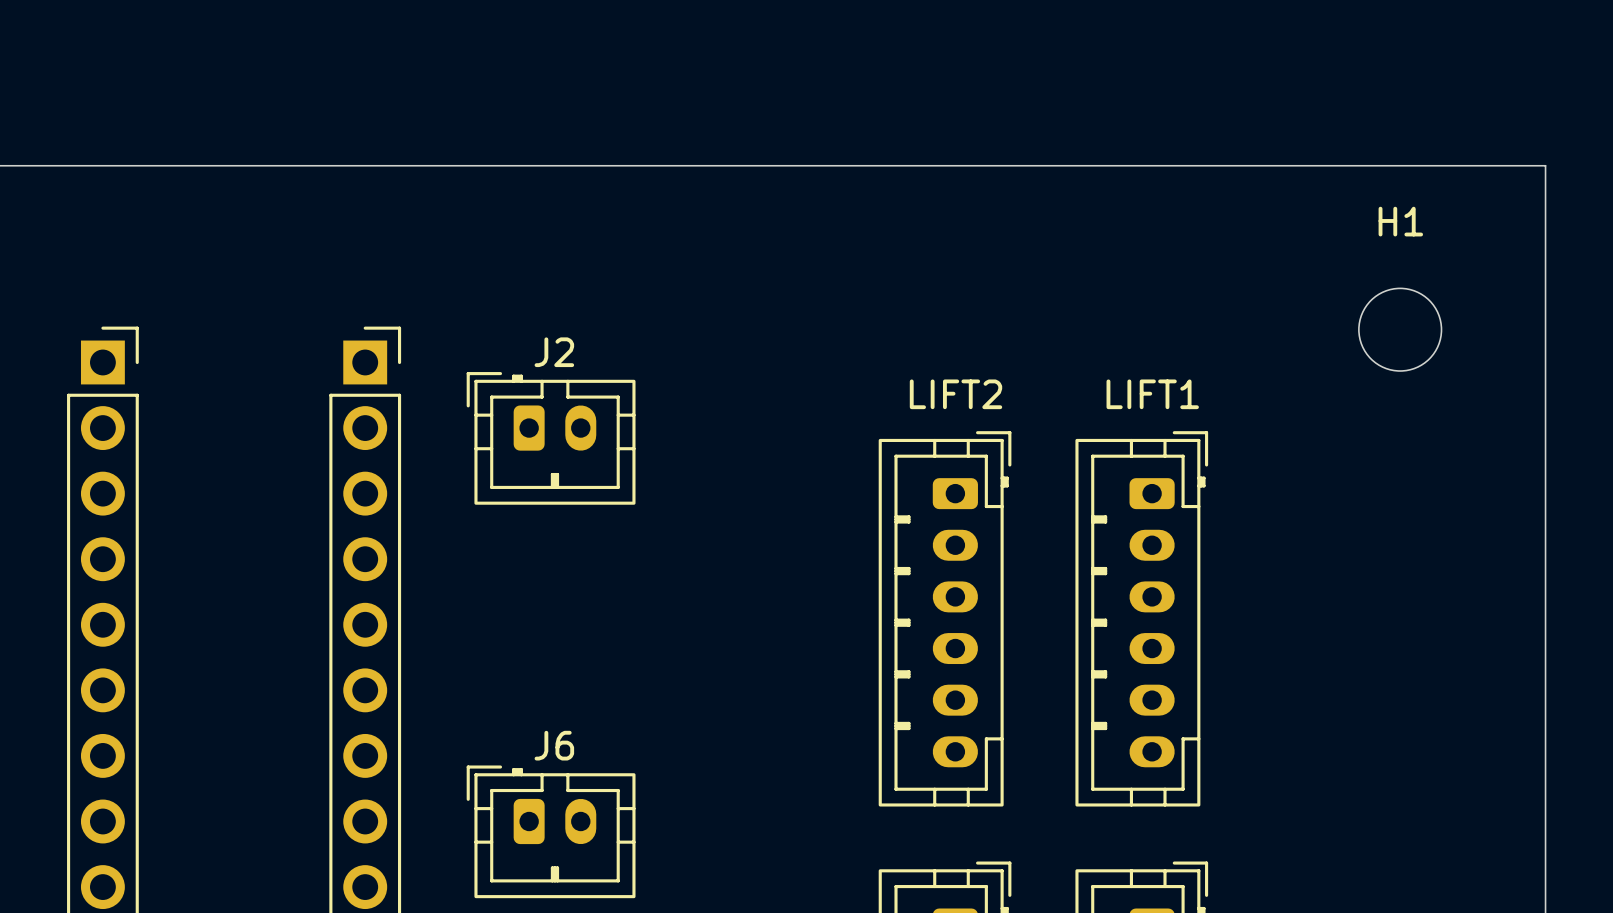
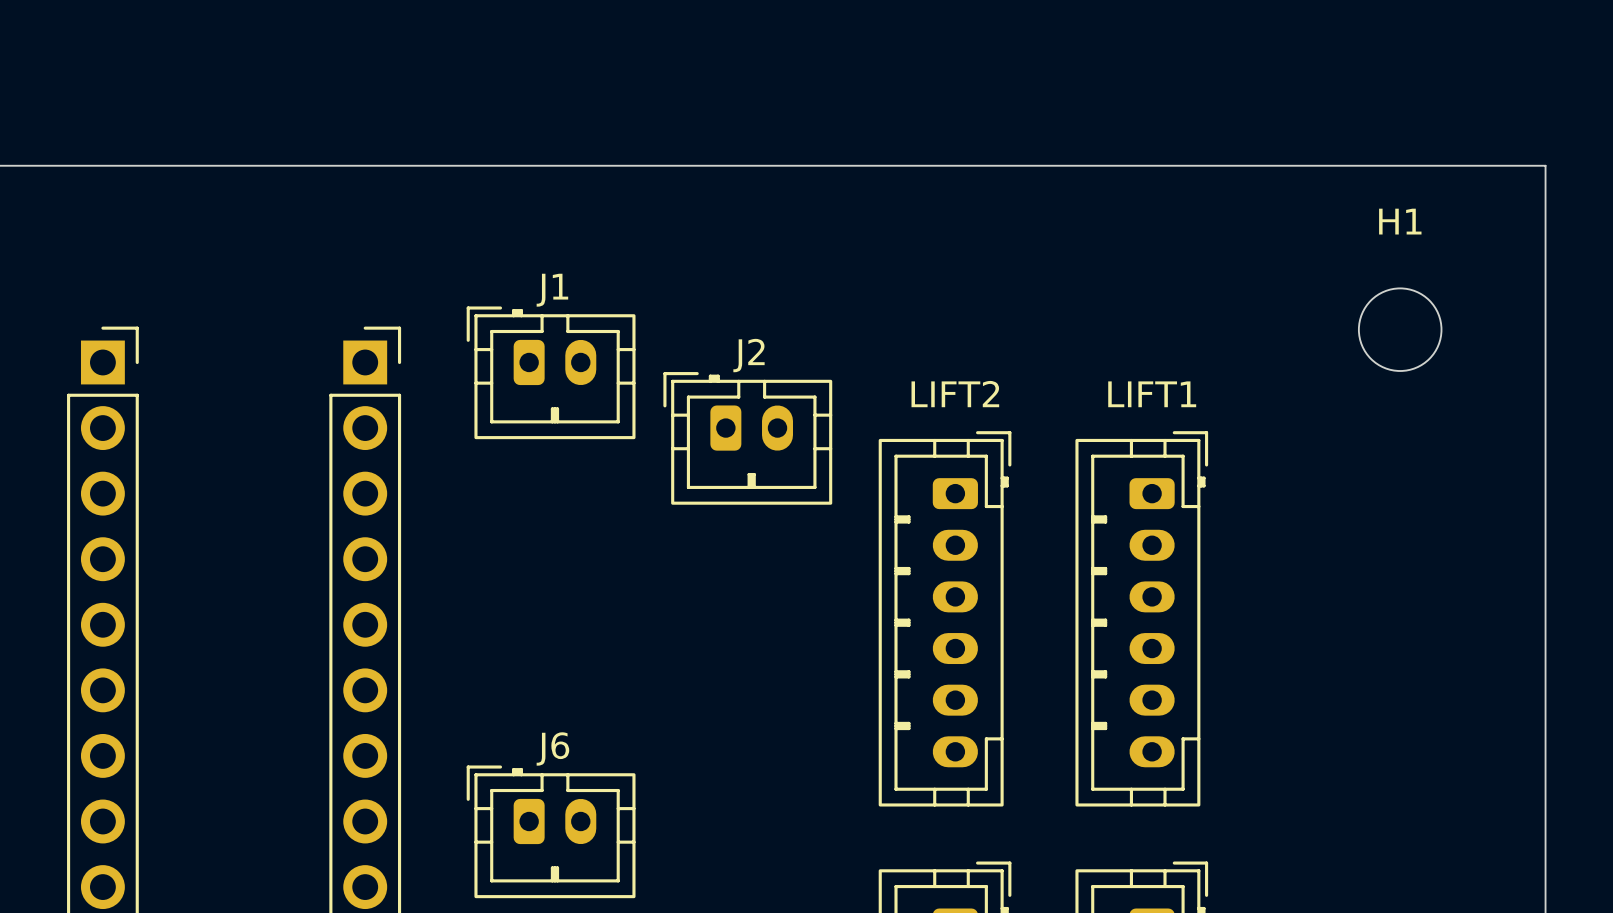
J1: none -> (551, 372)
J2 position: (551, 438) -> (747, 438)

